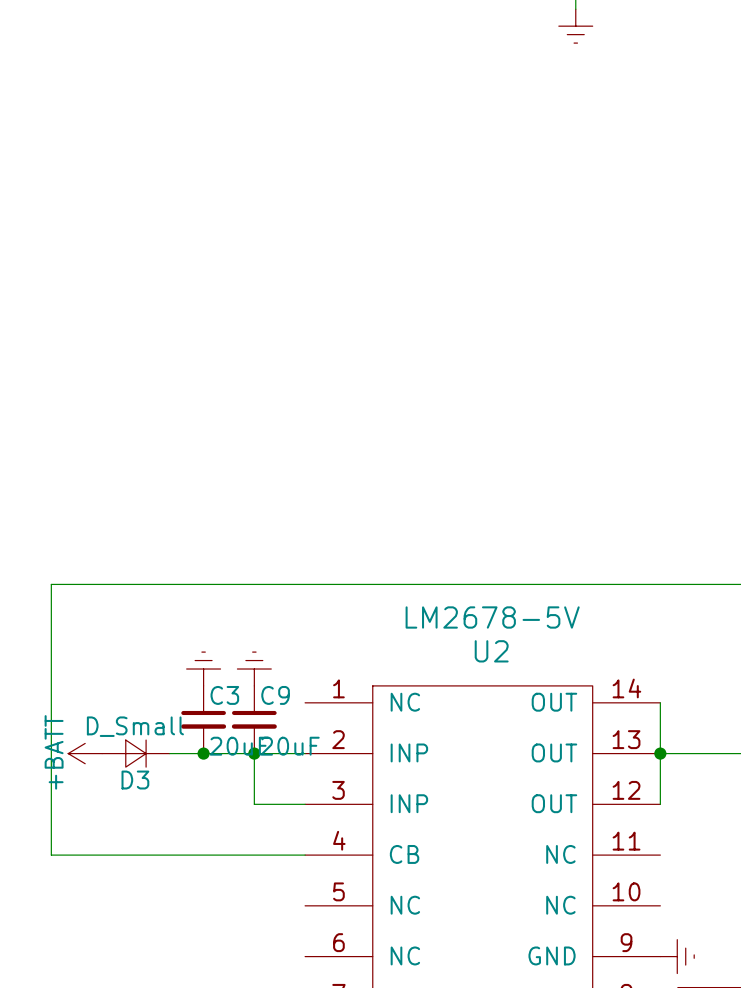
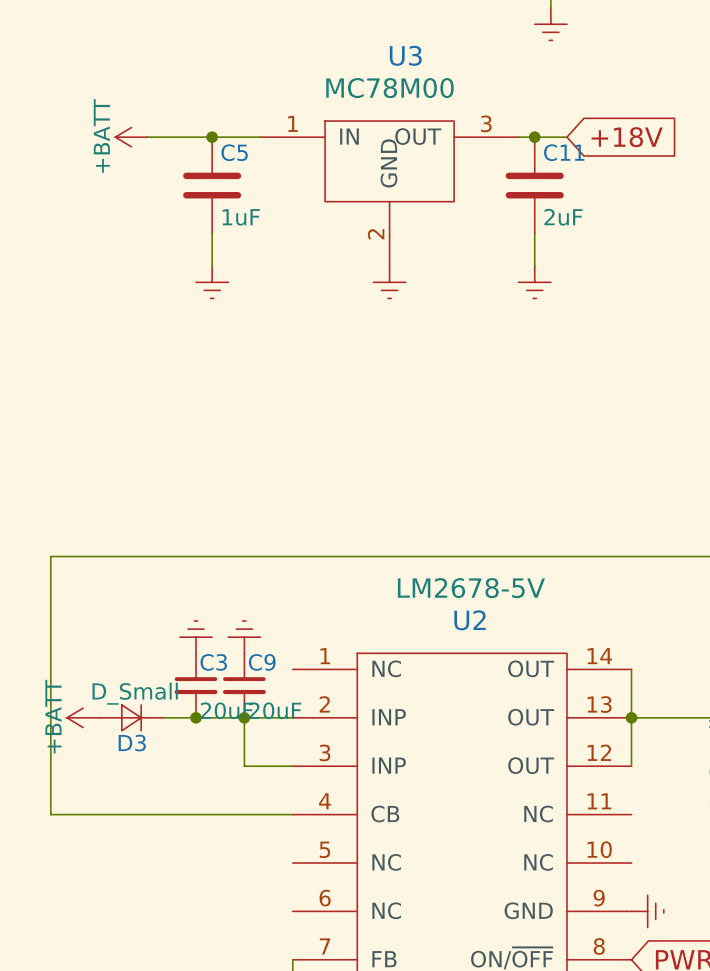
power symbol: none -> +BATT (131, 137)
wire: none -> (147, 137) (260, 137)
junction: none -> (212, 137)
wire: none -> (518, 137) (566, 137)
junction: none -> (534, 137)
global label: none -> +18V (627, 137)
C5: none -> 1uF (212, 185)
C11: none -> 2uF (534, 185)
U3: none -> MC78M00 (389, 193)
wire: none -> (212, 233) (212, 266)
wire: none -> (534, 233) (534, 266)
power symbol: none -> (212, 282)
power symbol: none -> (389, 282)
power symbol: none -> (534, 282)

